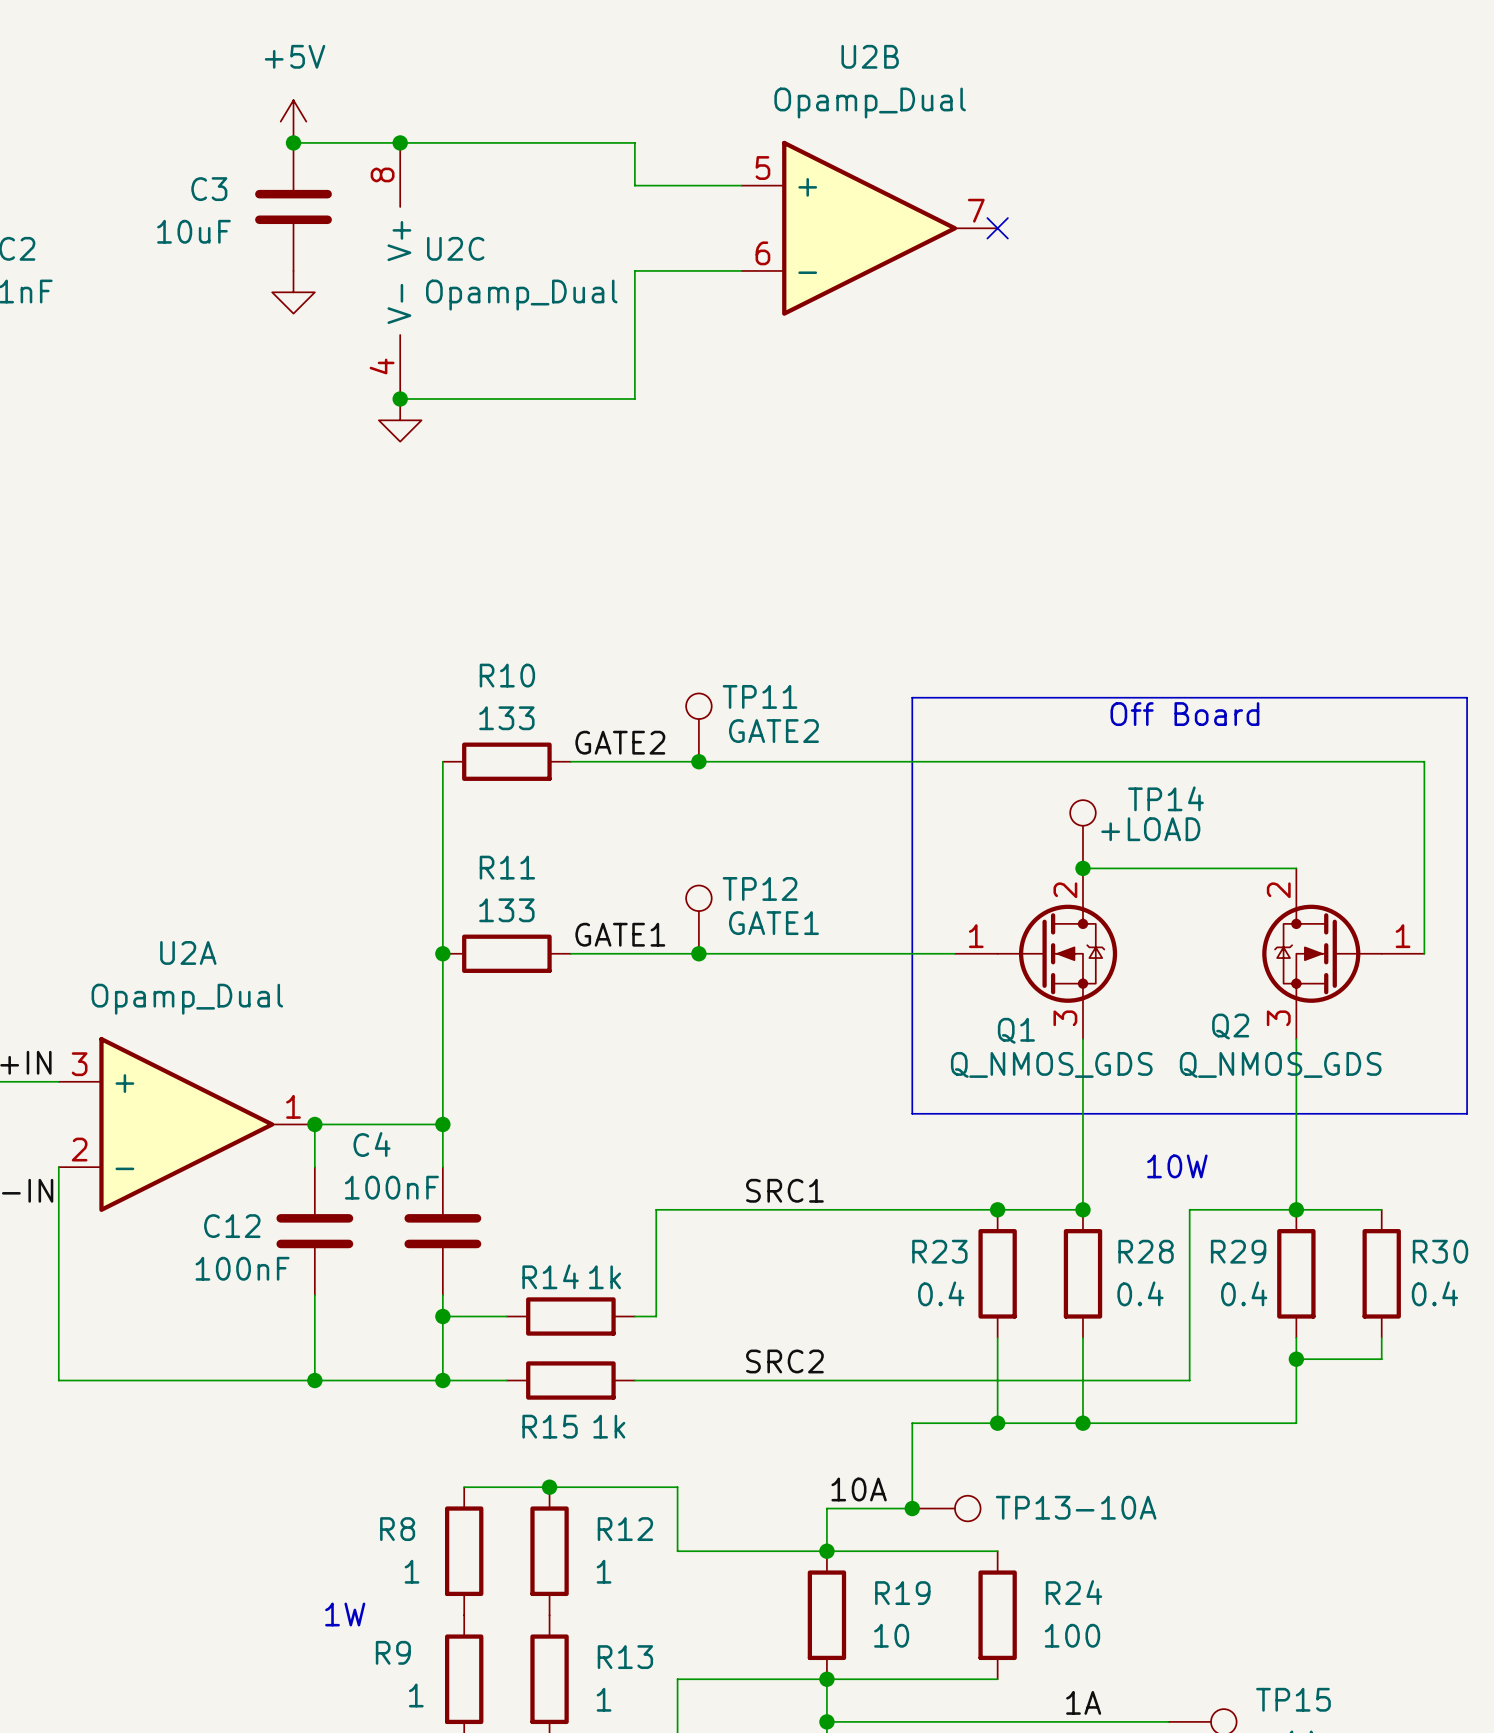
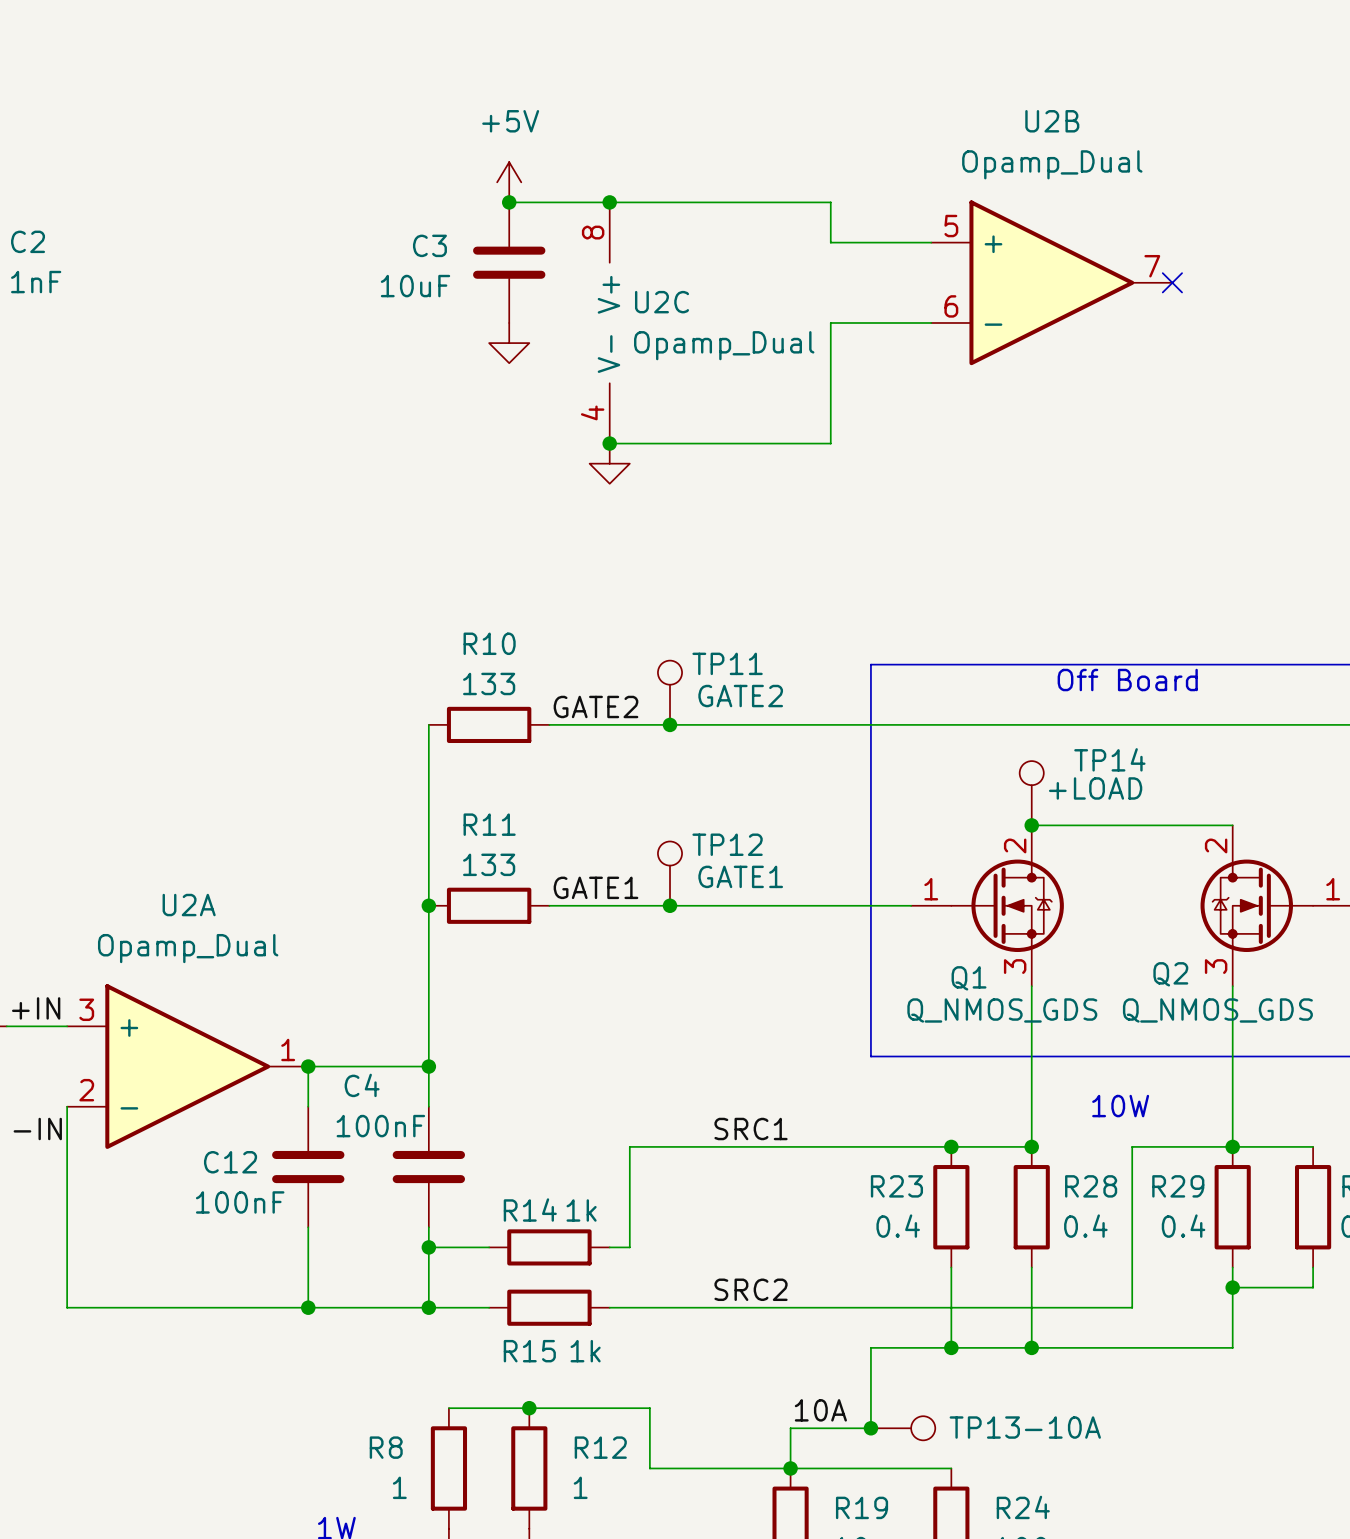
power symbol position: +5V (293, 121) -> +5V (509, 182)
wire: (293, 142) (634, 142) (634, 185) (741, 185) -> (509, 202) (830, 202) (830, 242) (931, 242)
junction: (293, 142) -> none
junction: (400, 142) -> none
C3 position: (293, 206) -> (509, 262)
junction: none -> (509, 202)
junction: none -> (609, 202)
U2B position: (869, 228) -> (1051, 282)
no-connect mark: (997, 228) -> none
U2C position: (400, 270) -> (609, 322)
wire: (741, 270) (634, 270) (634, 399) (400, 399) -> (931, 322) (830, 322) (830, 443) (609, 443)
power symbol: (293, 292) -> none
no-connect mark: none -> (1172, 282)
power symbol: none -> (509, 343)
junction: (400, 399) -> none
power symbol: (400, 420) -> none
junction: none -> (609, 443)
power symbol: none -> (609, 463)

